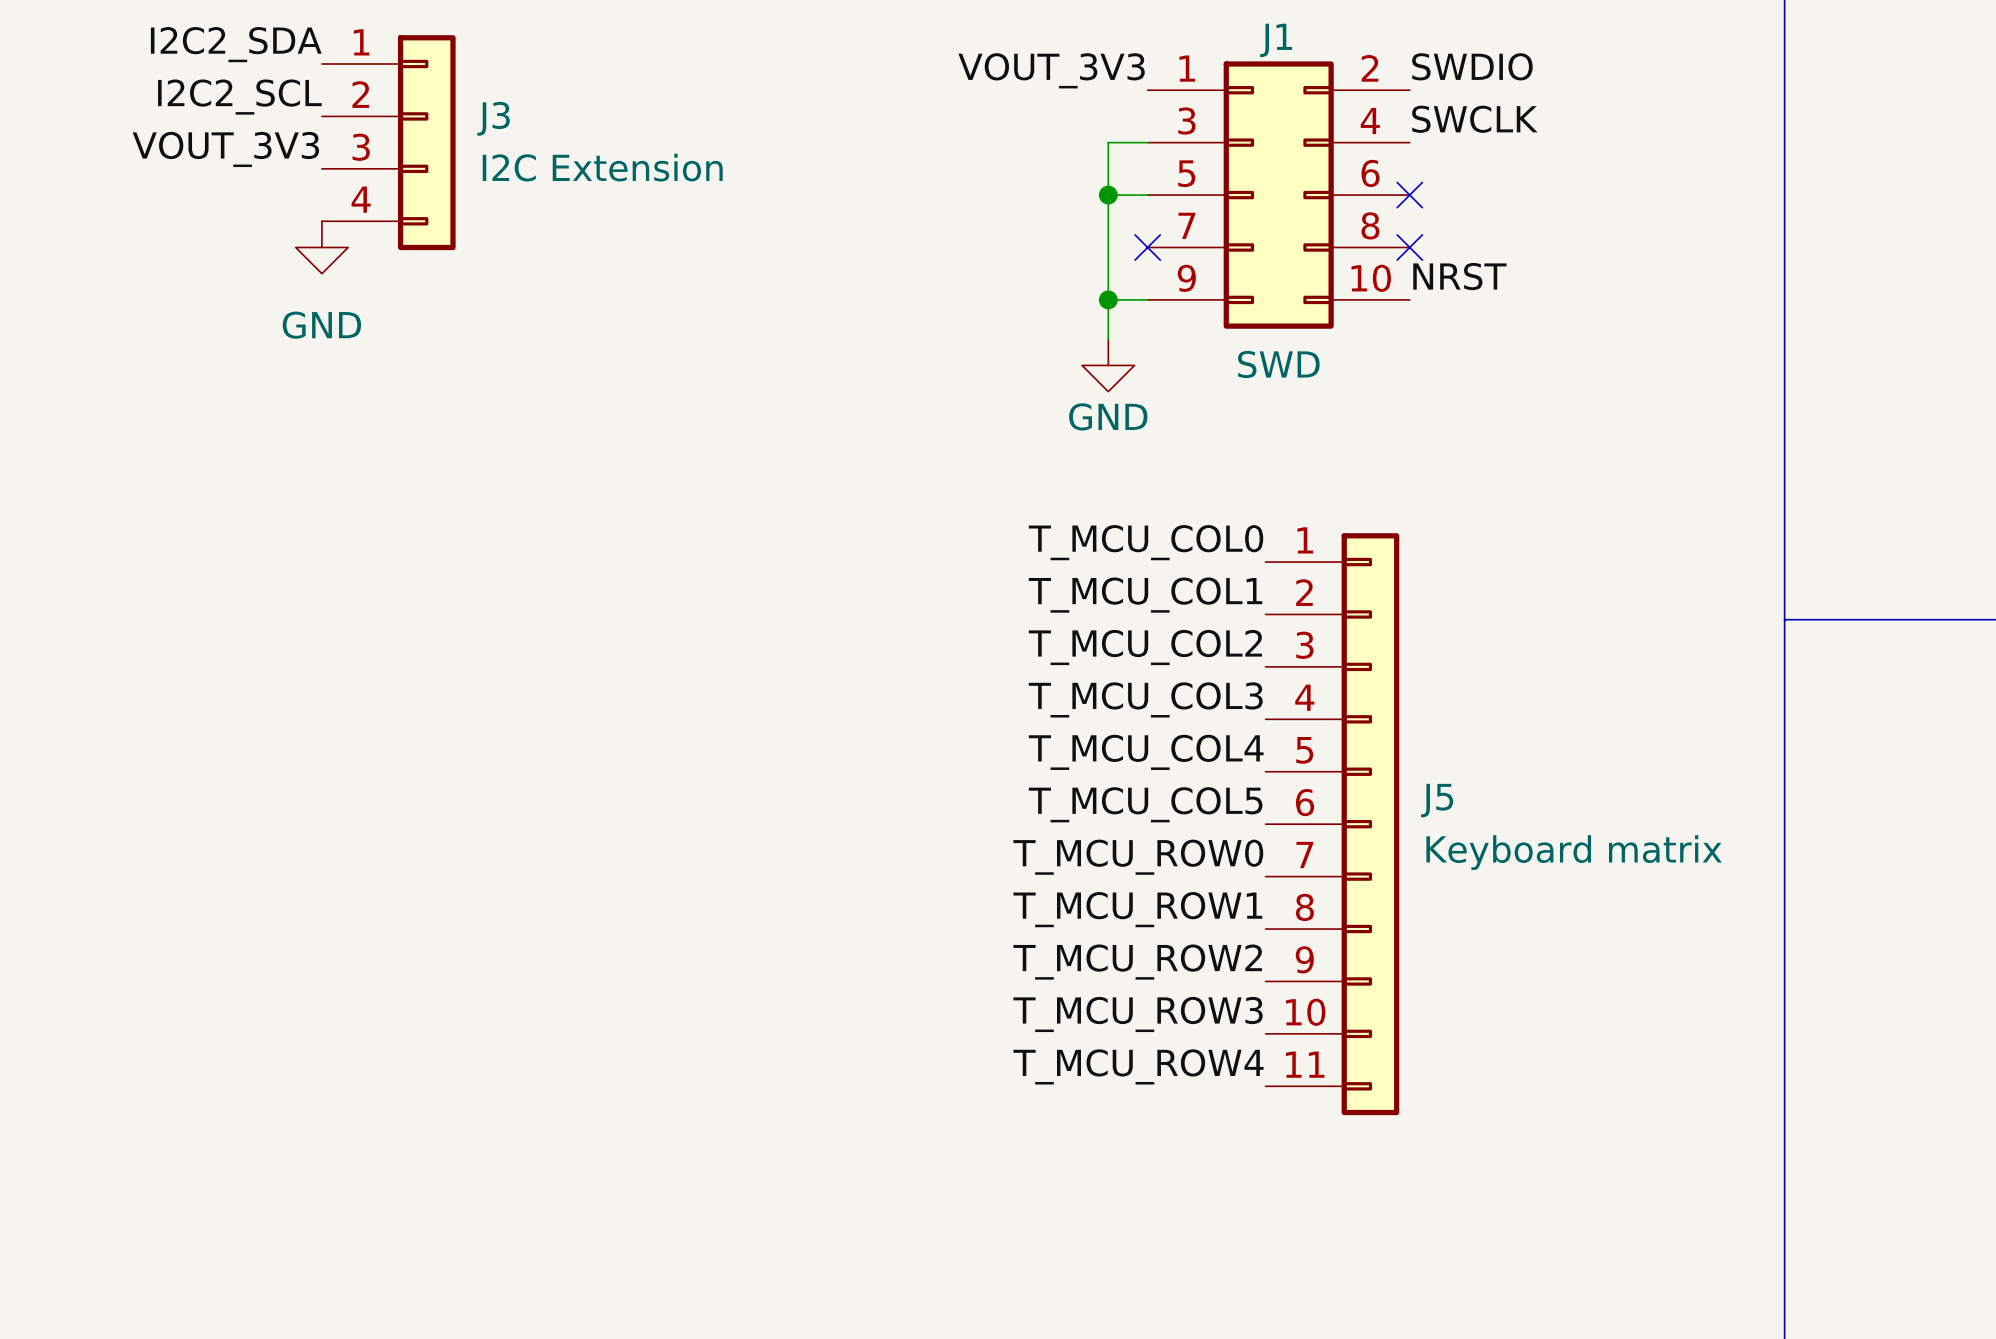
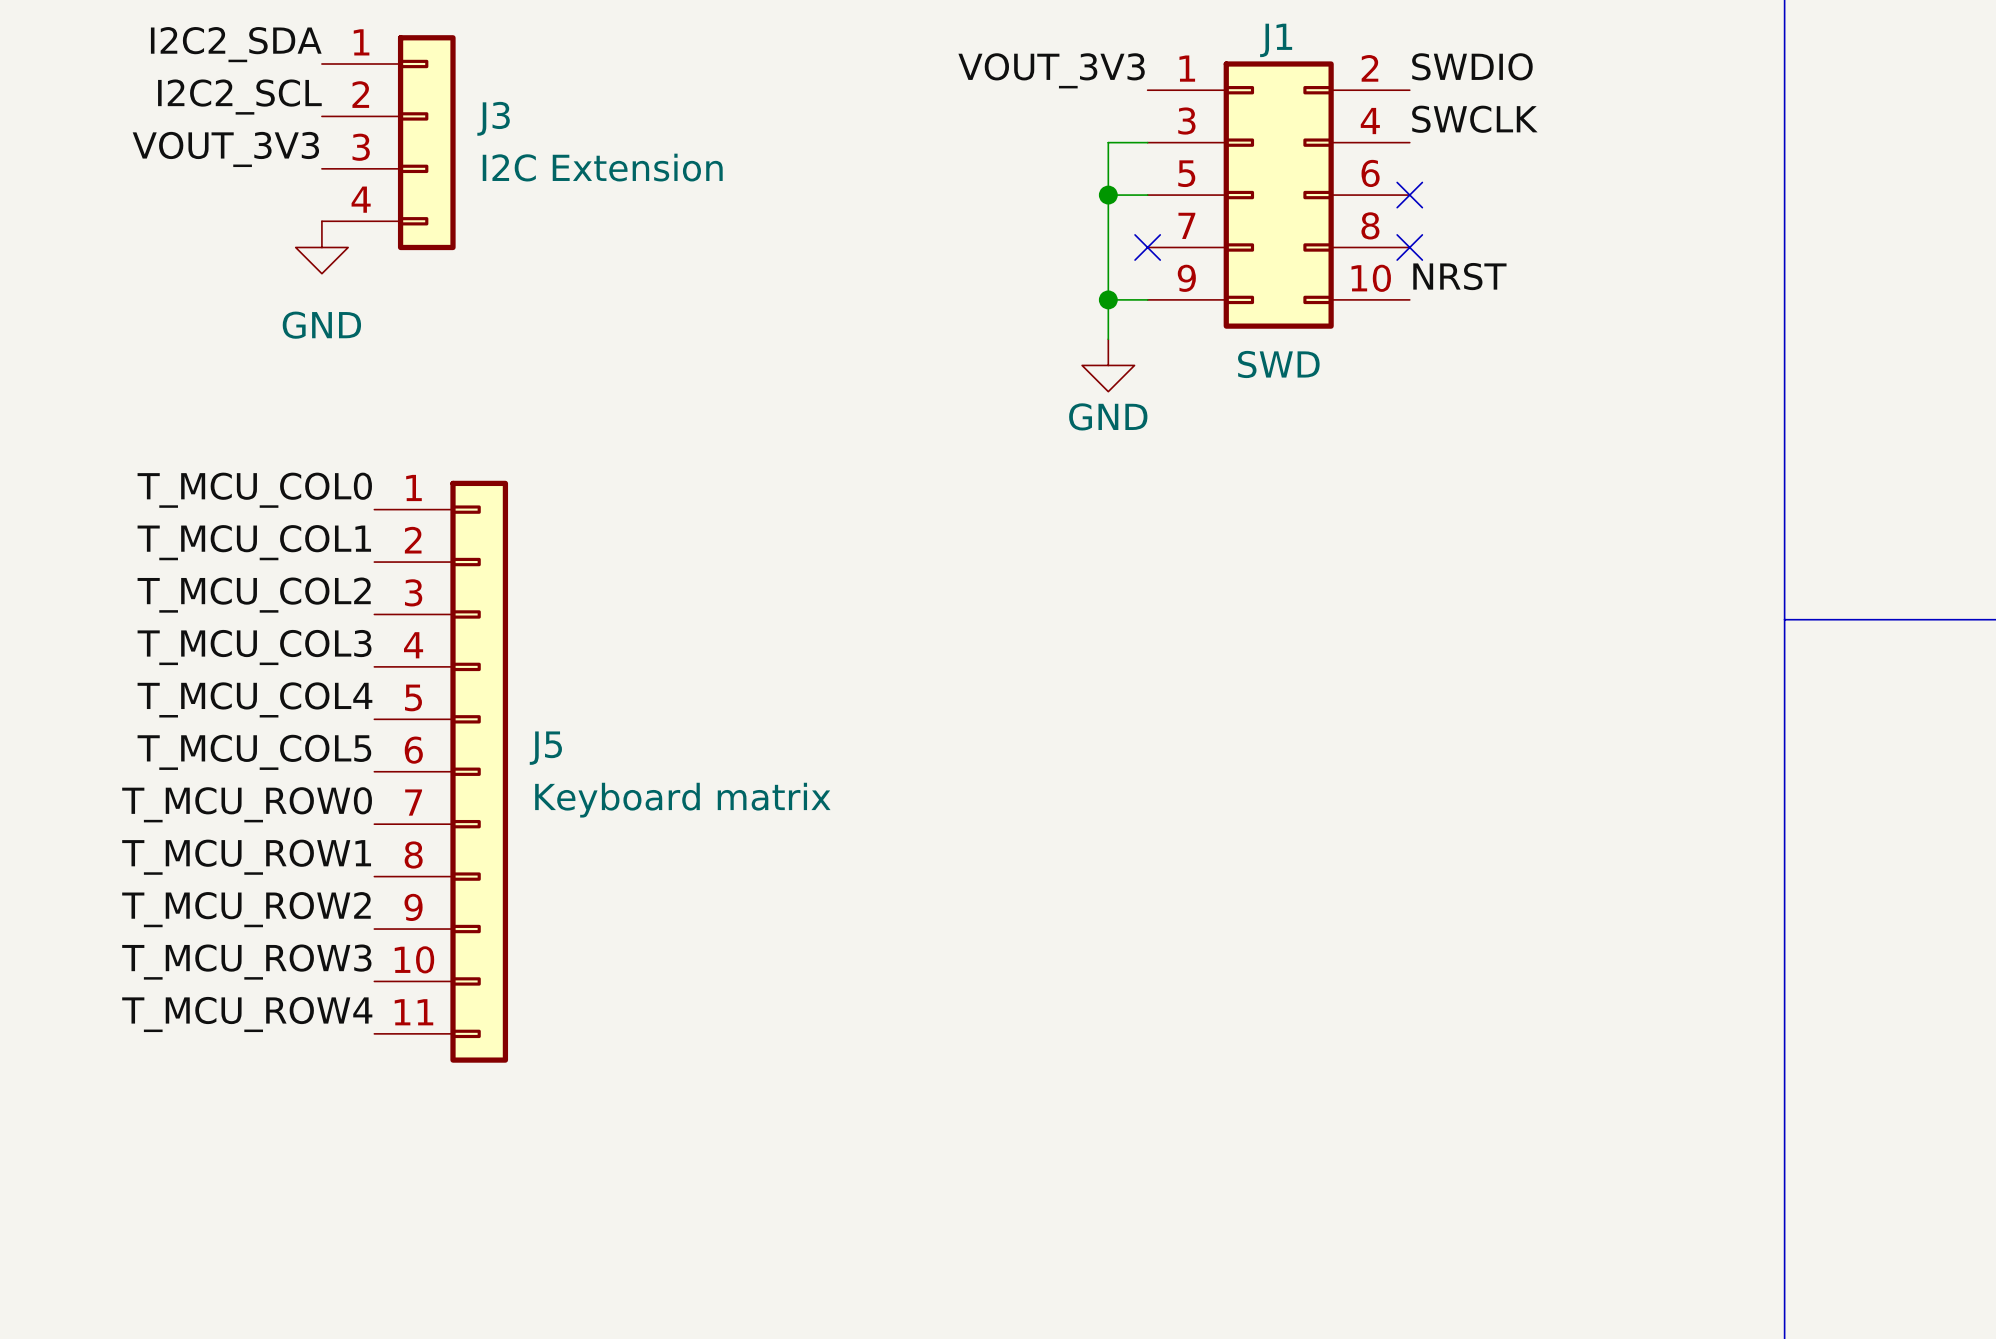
label: none -> T_MCU_COL0 (254, 490)
label: none -> T_MCU_COL1 (254, 542)
label: T_MCU_COL0 (1146, 542) -> none
label: none -> T_MCU_COL2 (254, 595)
label: T_MCU_COL1 (1145, 595) -> none
label: none -> T_MCU_COL3 (254, 647)
label: T_MCU_COL2 (1145, 647) -> none
label: none -> T_MCU_COL4 (254, 699)
label: T_MCU_COL3 (1145, 699) -> none
label: none -> T_MCU_COL5 (254, 752)
label: T_MCU_COL4 (1146, 752) -> none
label: none -> T_MCU_ROW0 (247, 804)
label: T_MCU_COL5 (1145, 804) -> none
J5 position: (1332, 824) -> (441, 771)
label: none -> T_MCU_ROW1 (246, 857)
label: T_MCU_ROW0 (1138, 857) -> none
label: none -> T_MCU_ROW2 (246, 909)
label: T_MCU_ROW1 (1137, 909) -> none
label: none -> T_MCU_ROW3 (246, 962)
label: T_MCU_ROW2 (1137, 962) -> none
label: none -> T_MCU_ROW4 (247, 1014)
label: T_MCU_ROW3 (1138, 1014) -> none
label: T_MCU_ROW4 (1138, 1066) -> none

